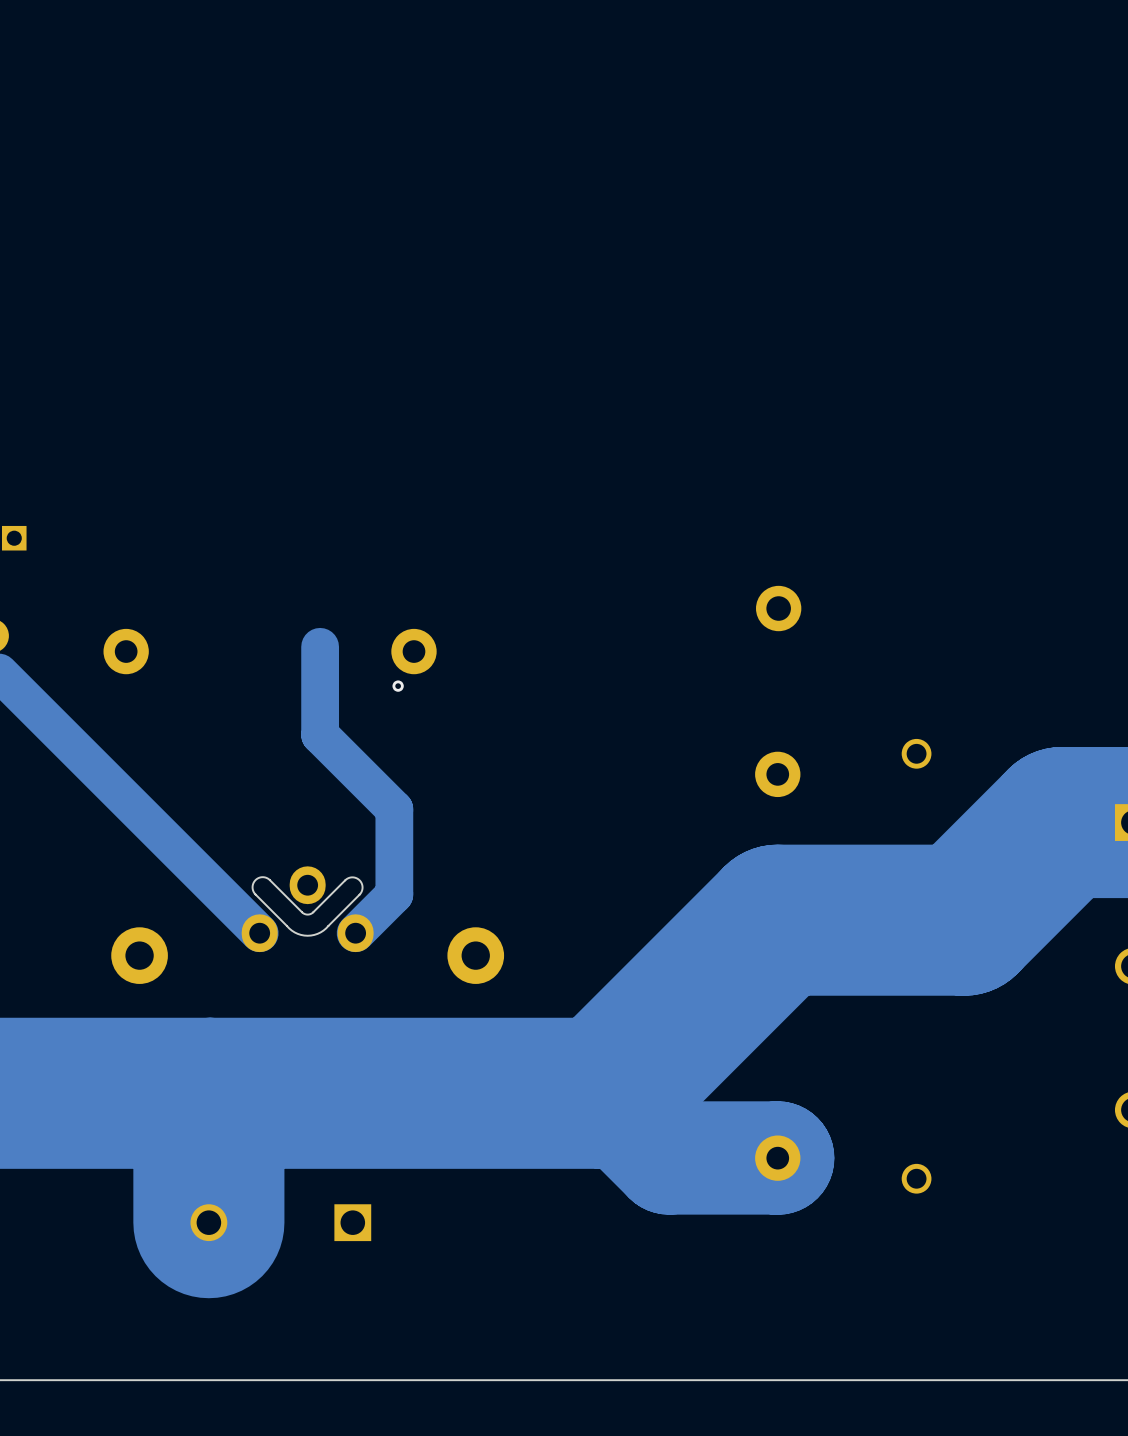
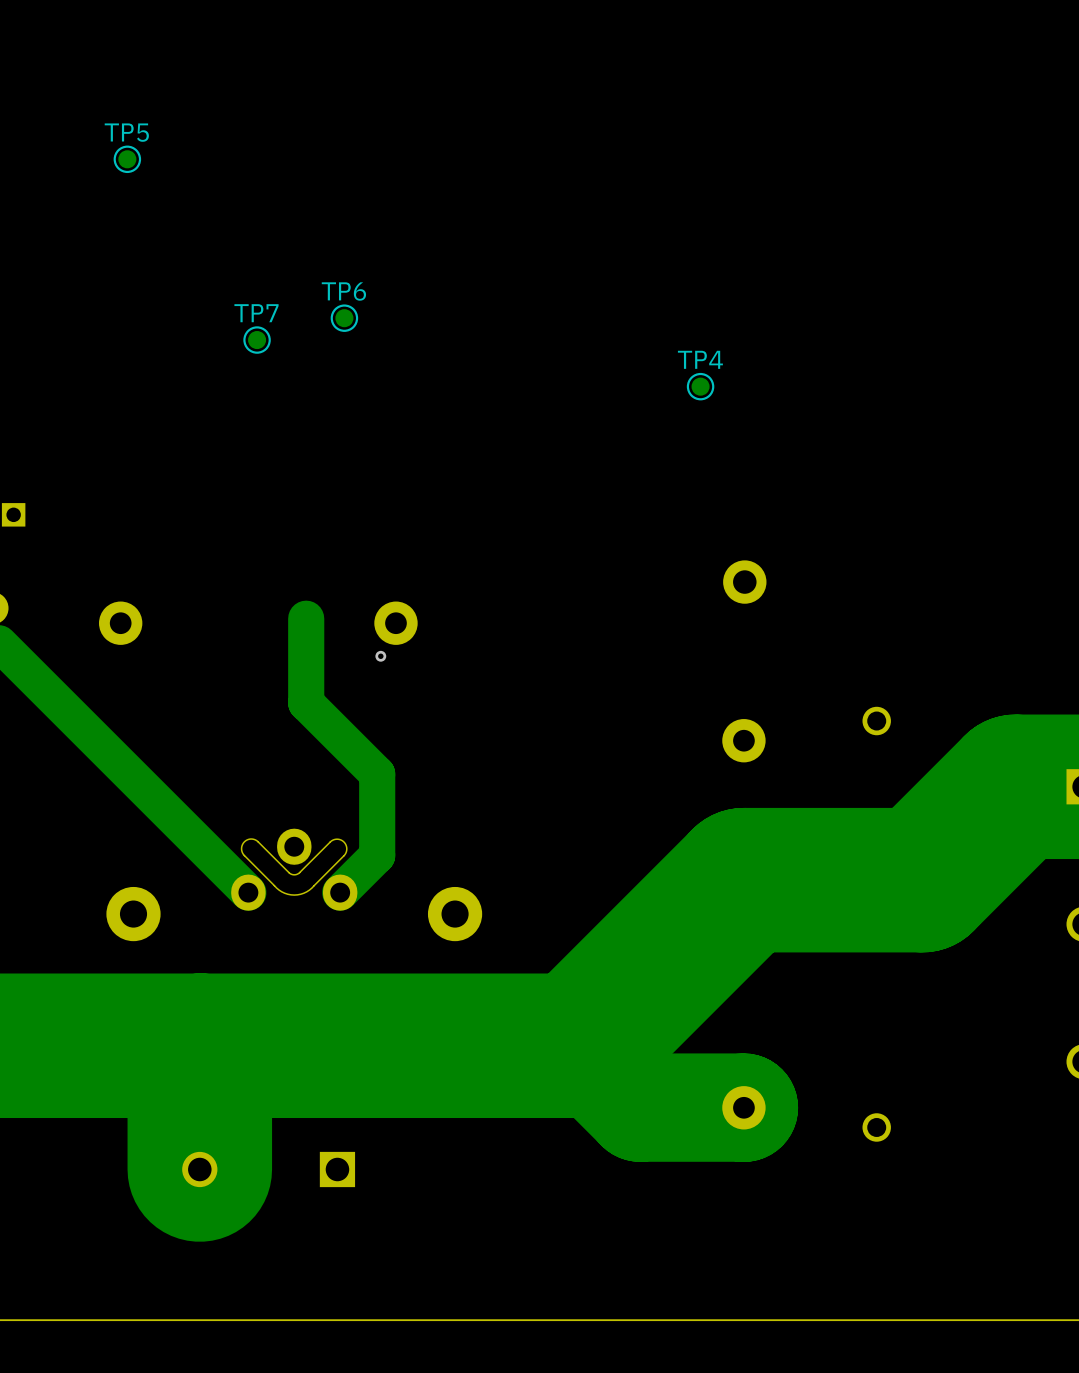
TP5: none -> (127, 159)
TP6: none -> (344, 318)
TP7: none -> (257, 340)
TP4: none -> (700, 386)

